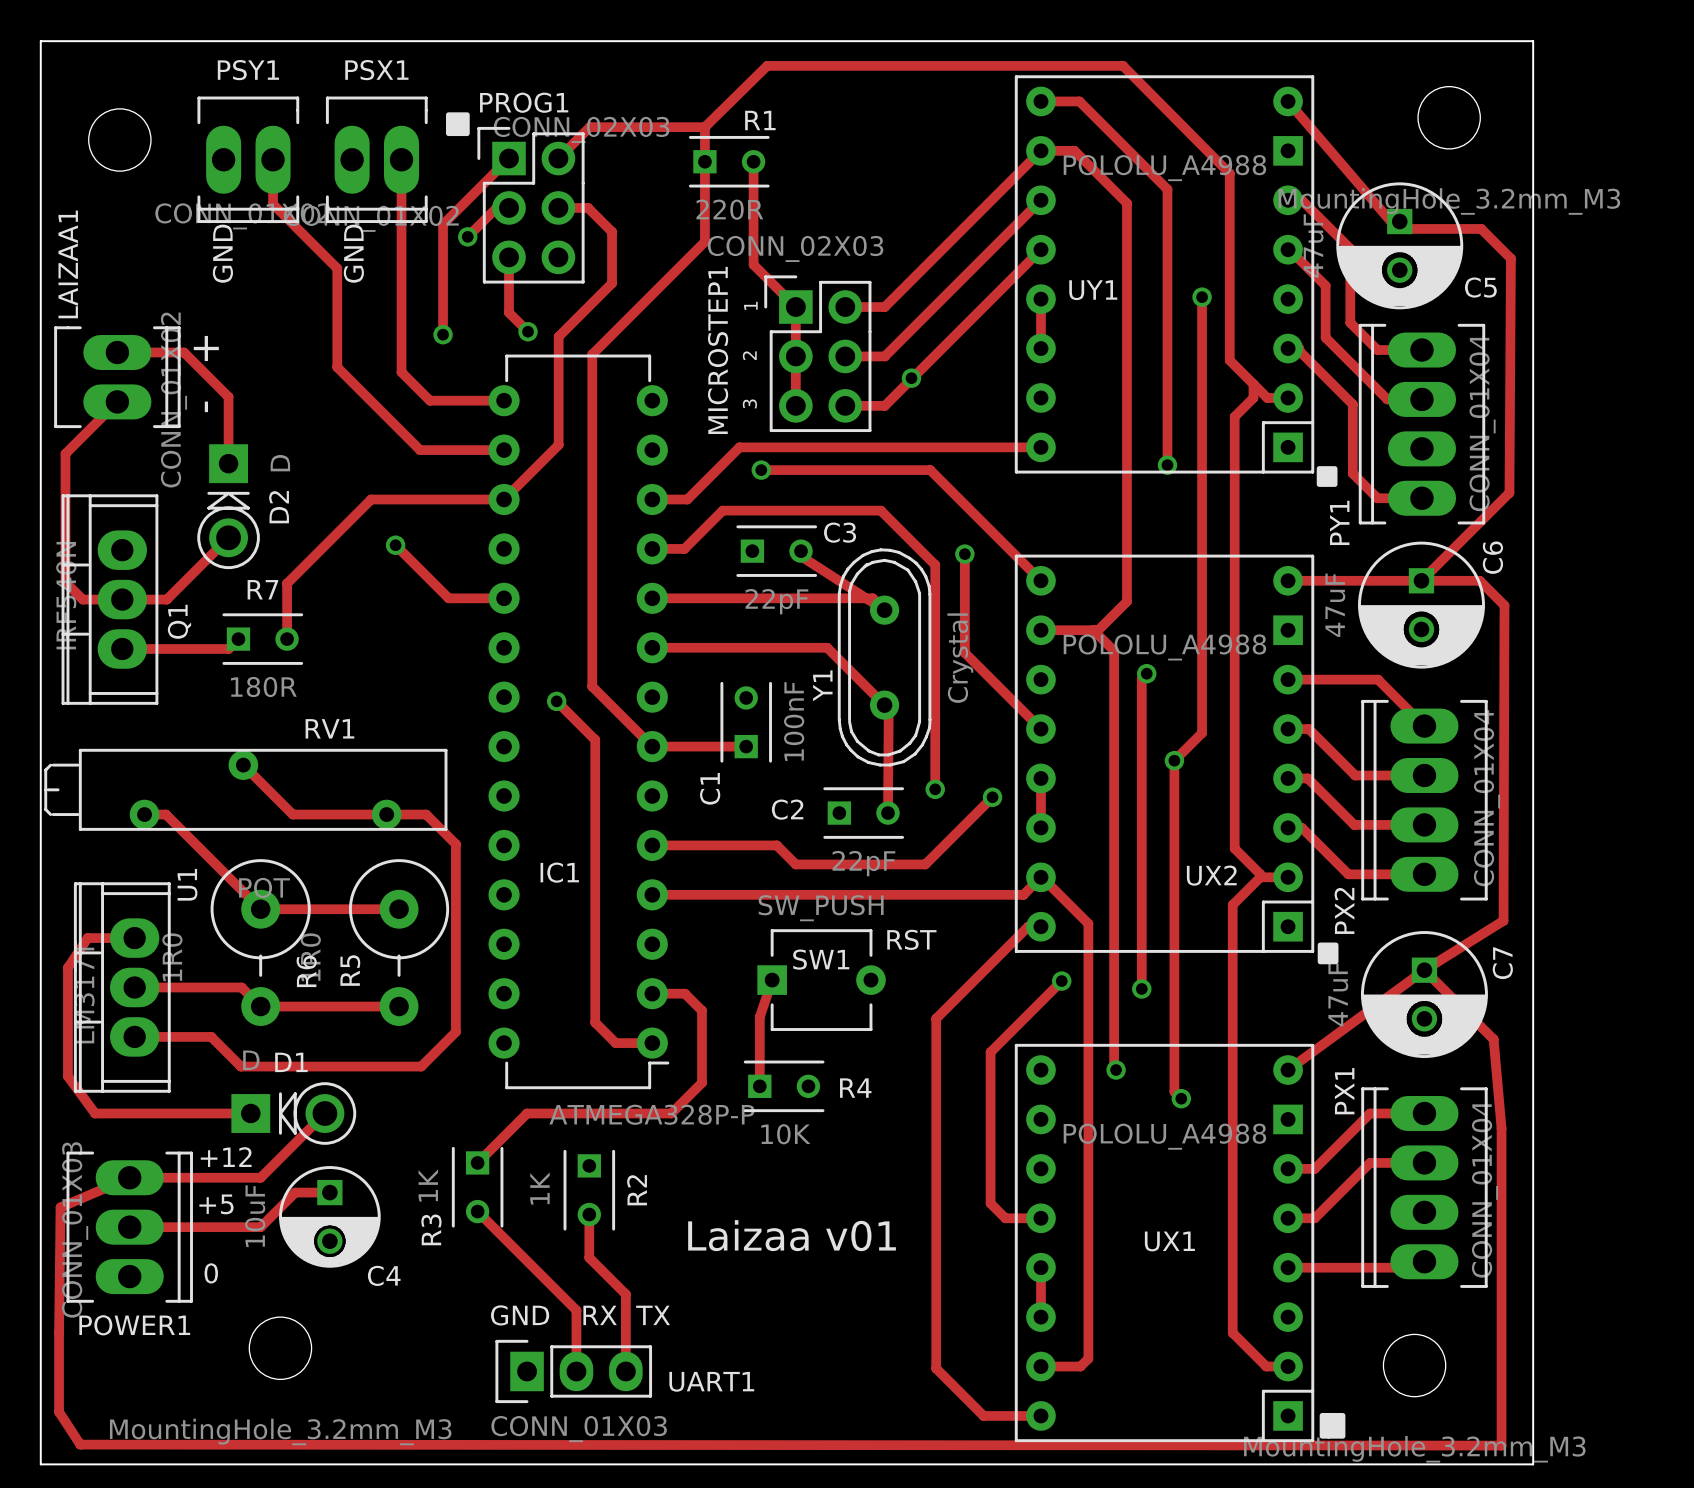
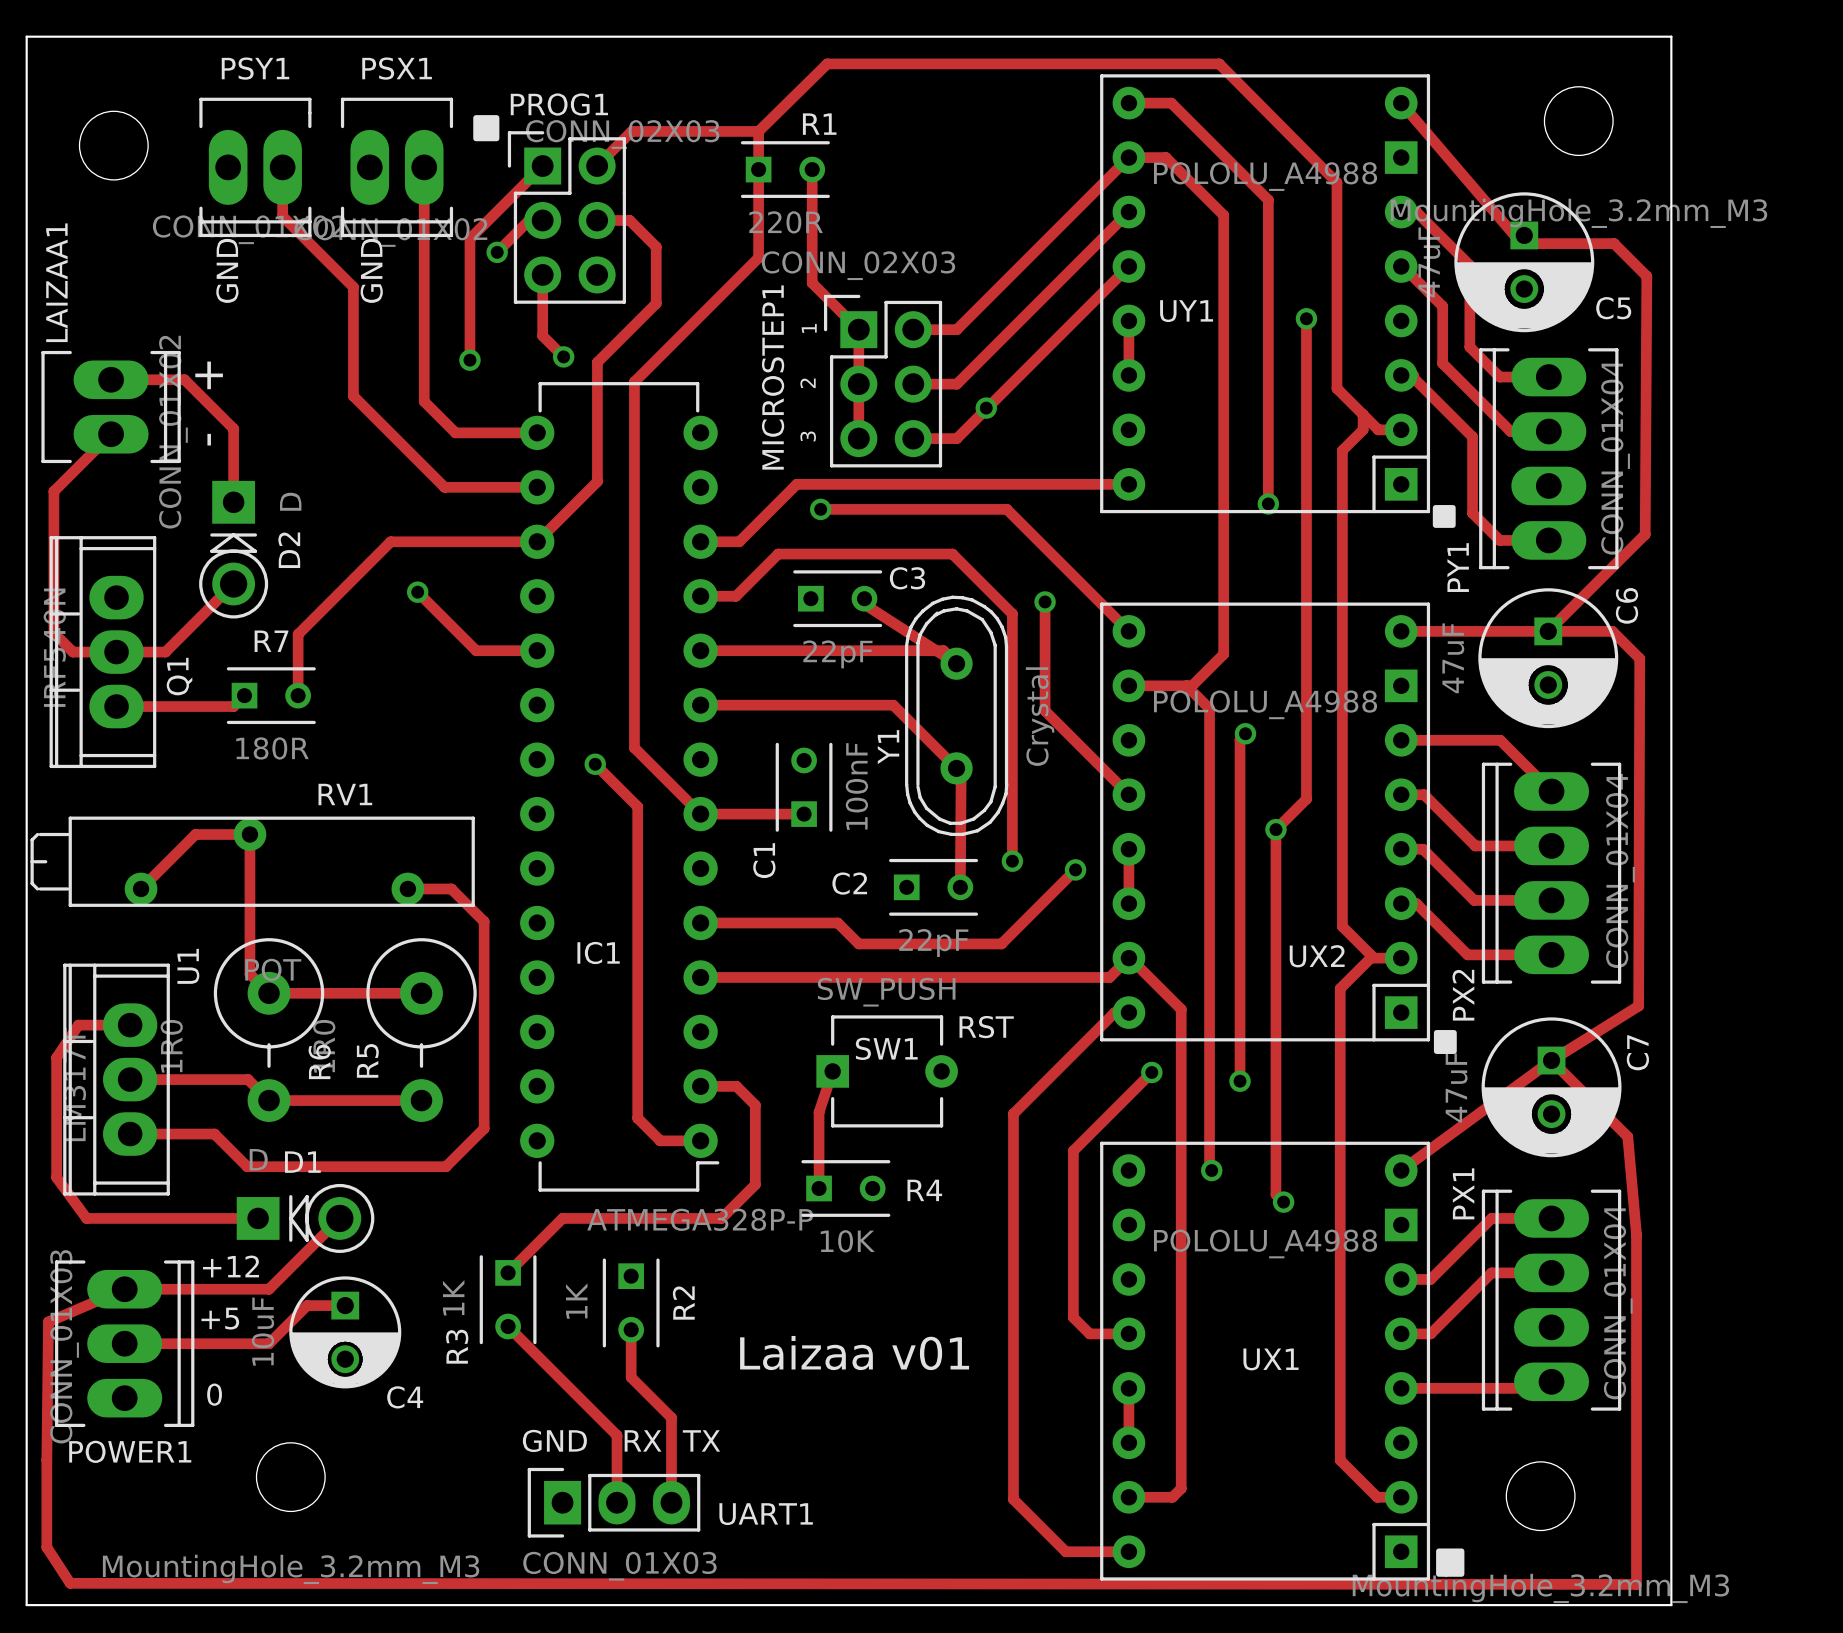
track: (243, 765) (292, 814) (386, 814) -> none
track: (144, 814) (166, 814) (243, 891) -> (141, 888) (195, 834) (249, 834) (249, 974)

